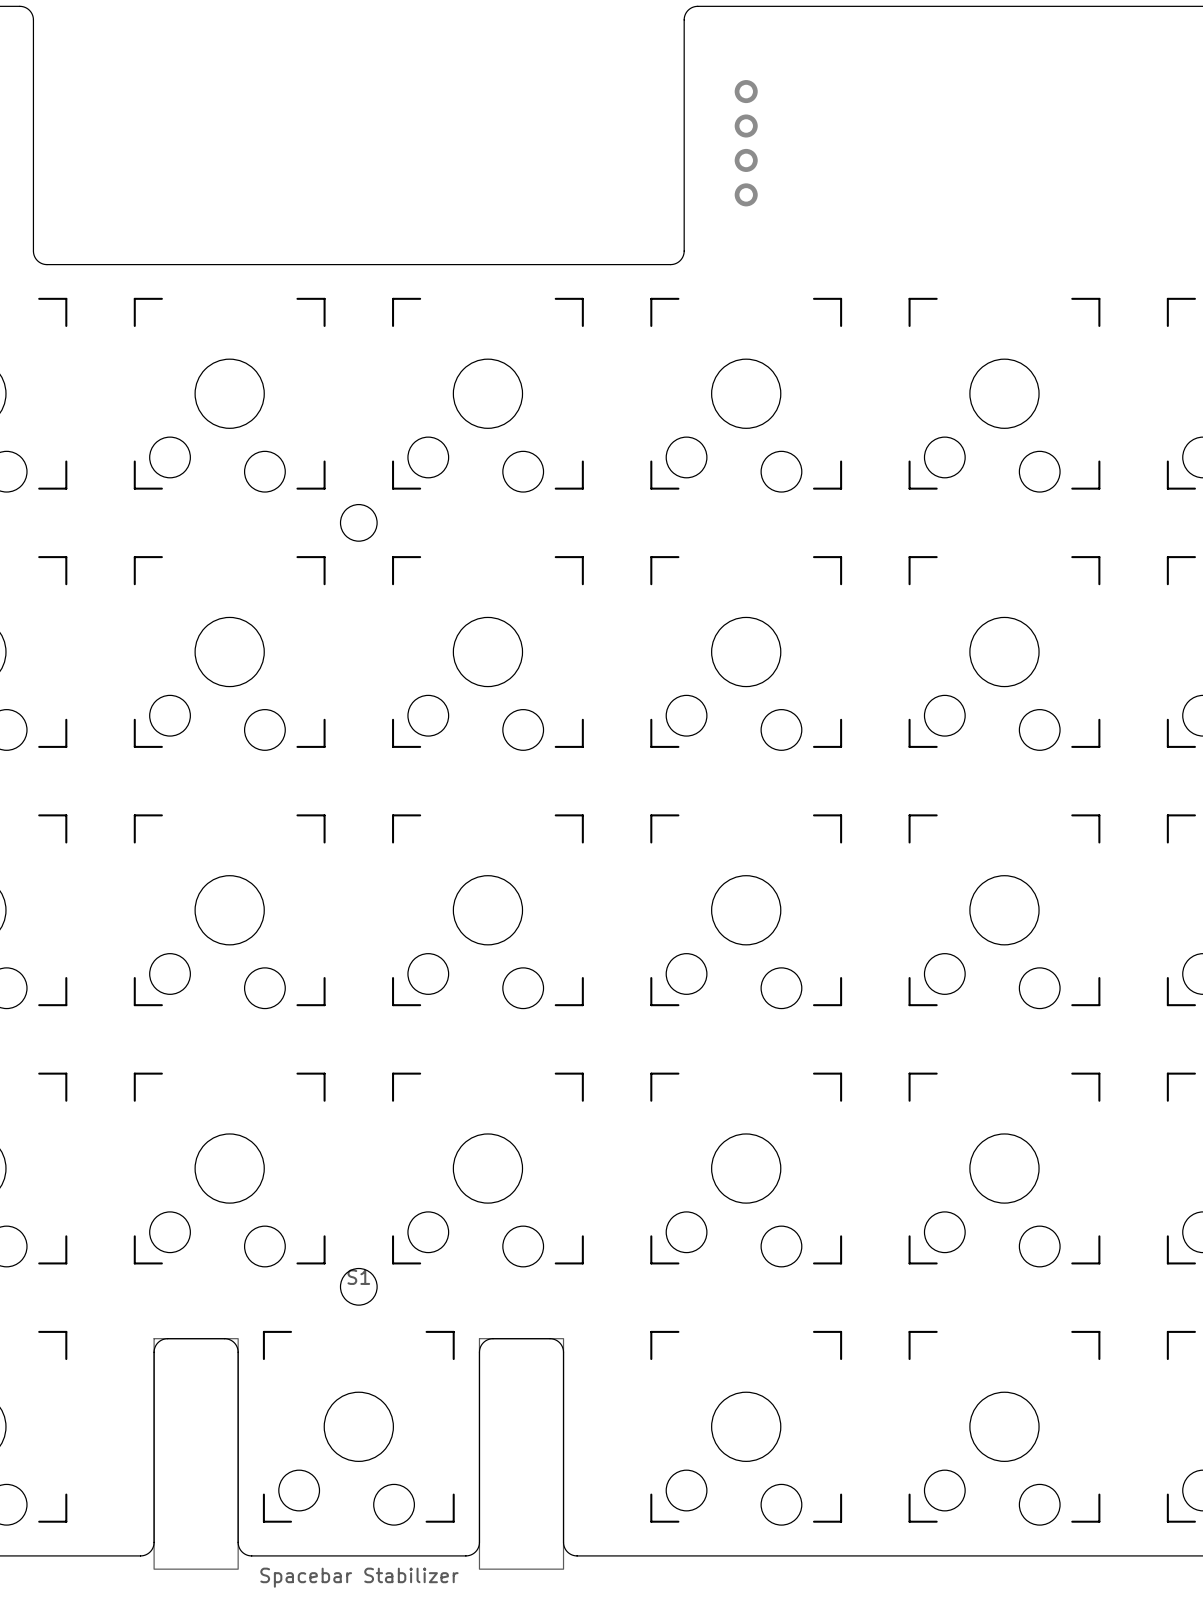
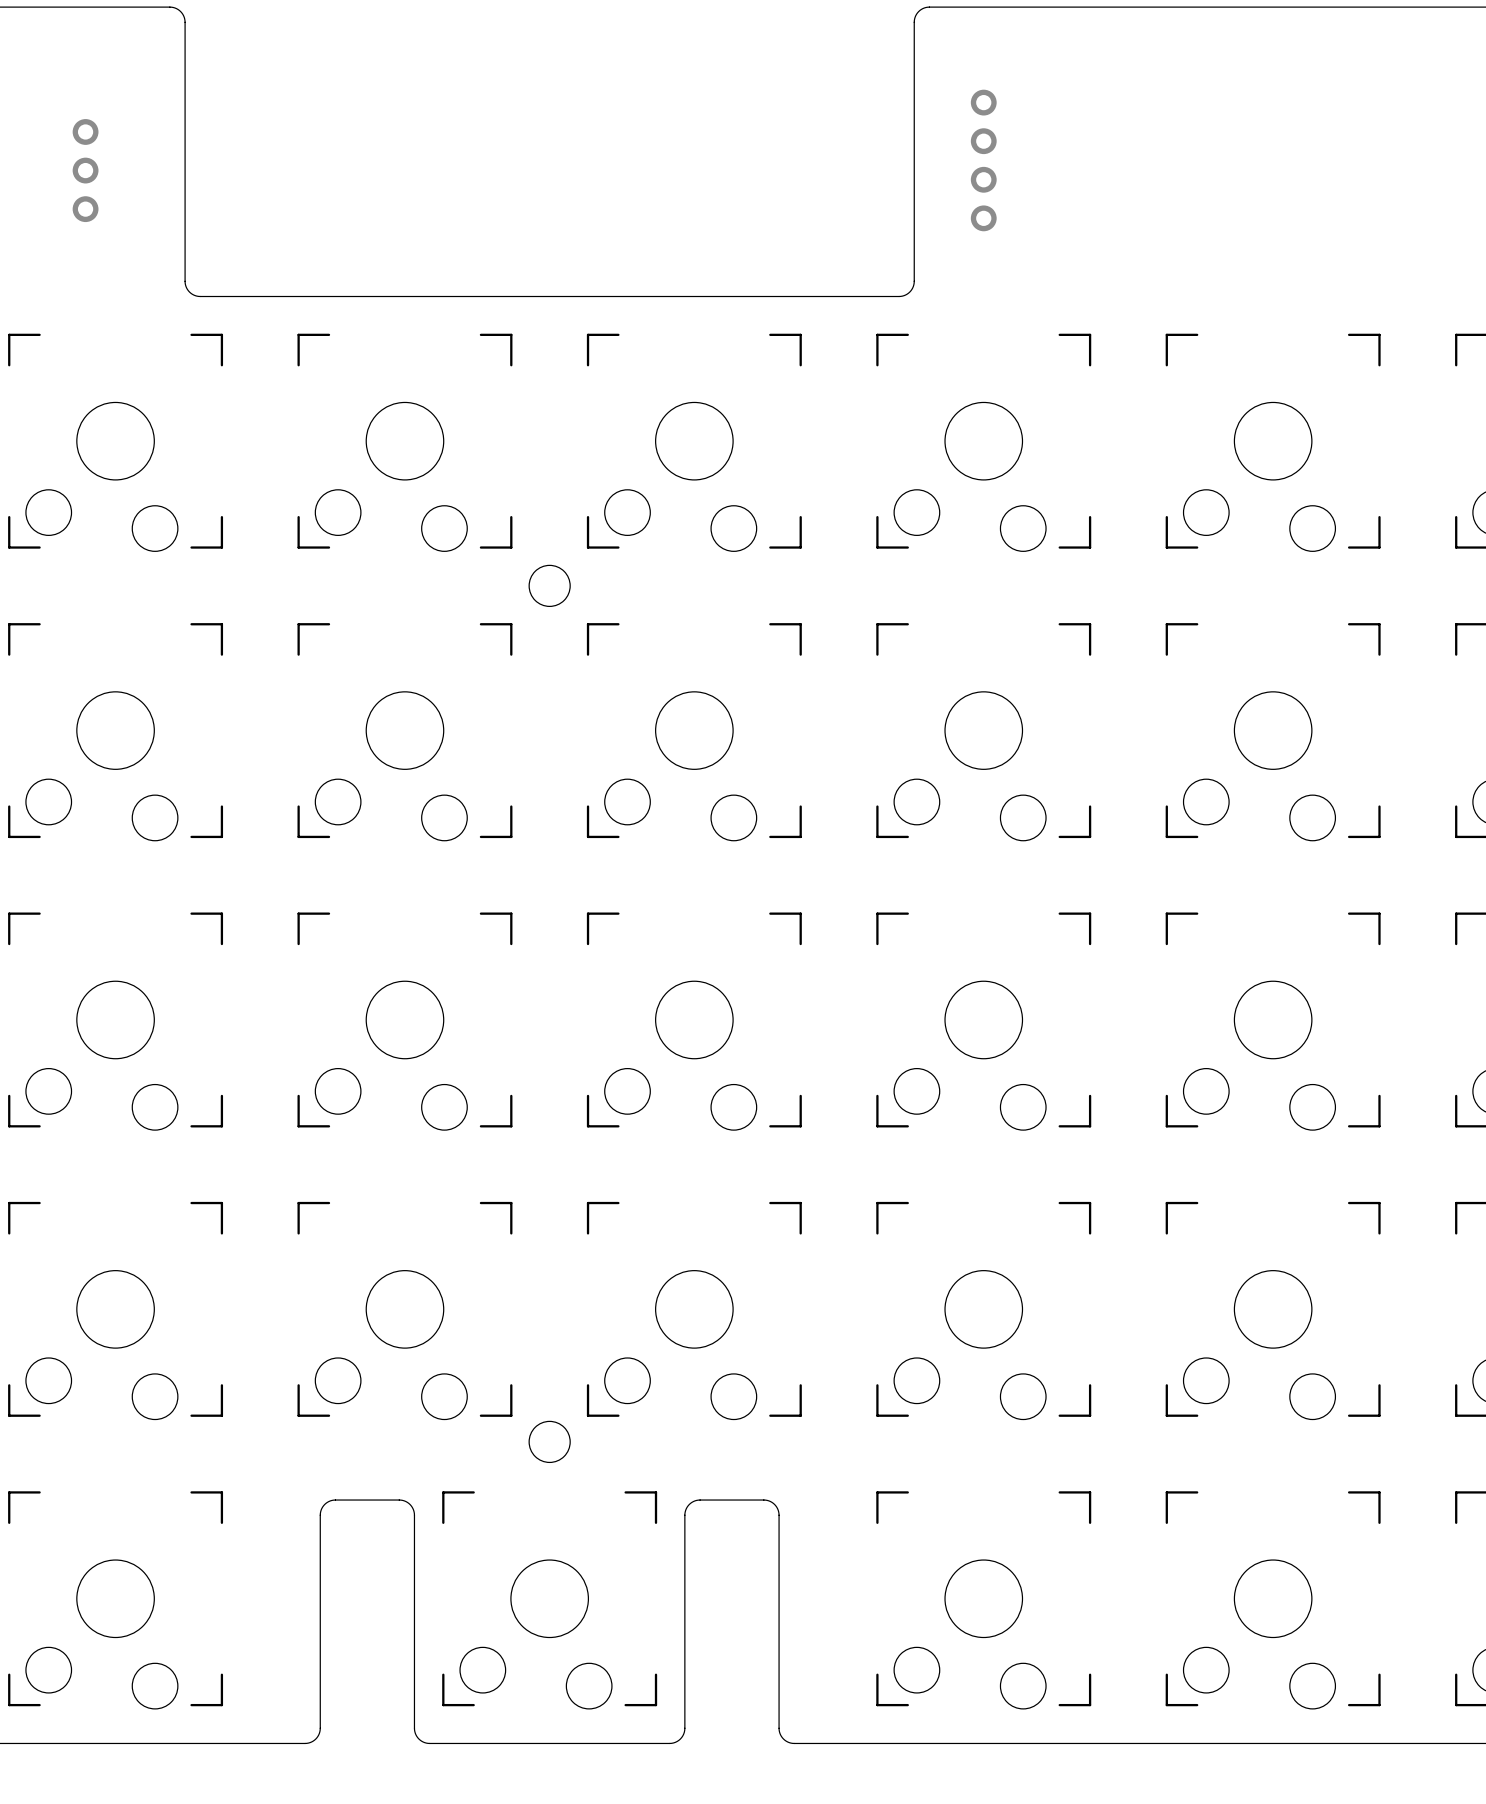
S1: Spacebar Stabilizer (358, 1453) -> none

